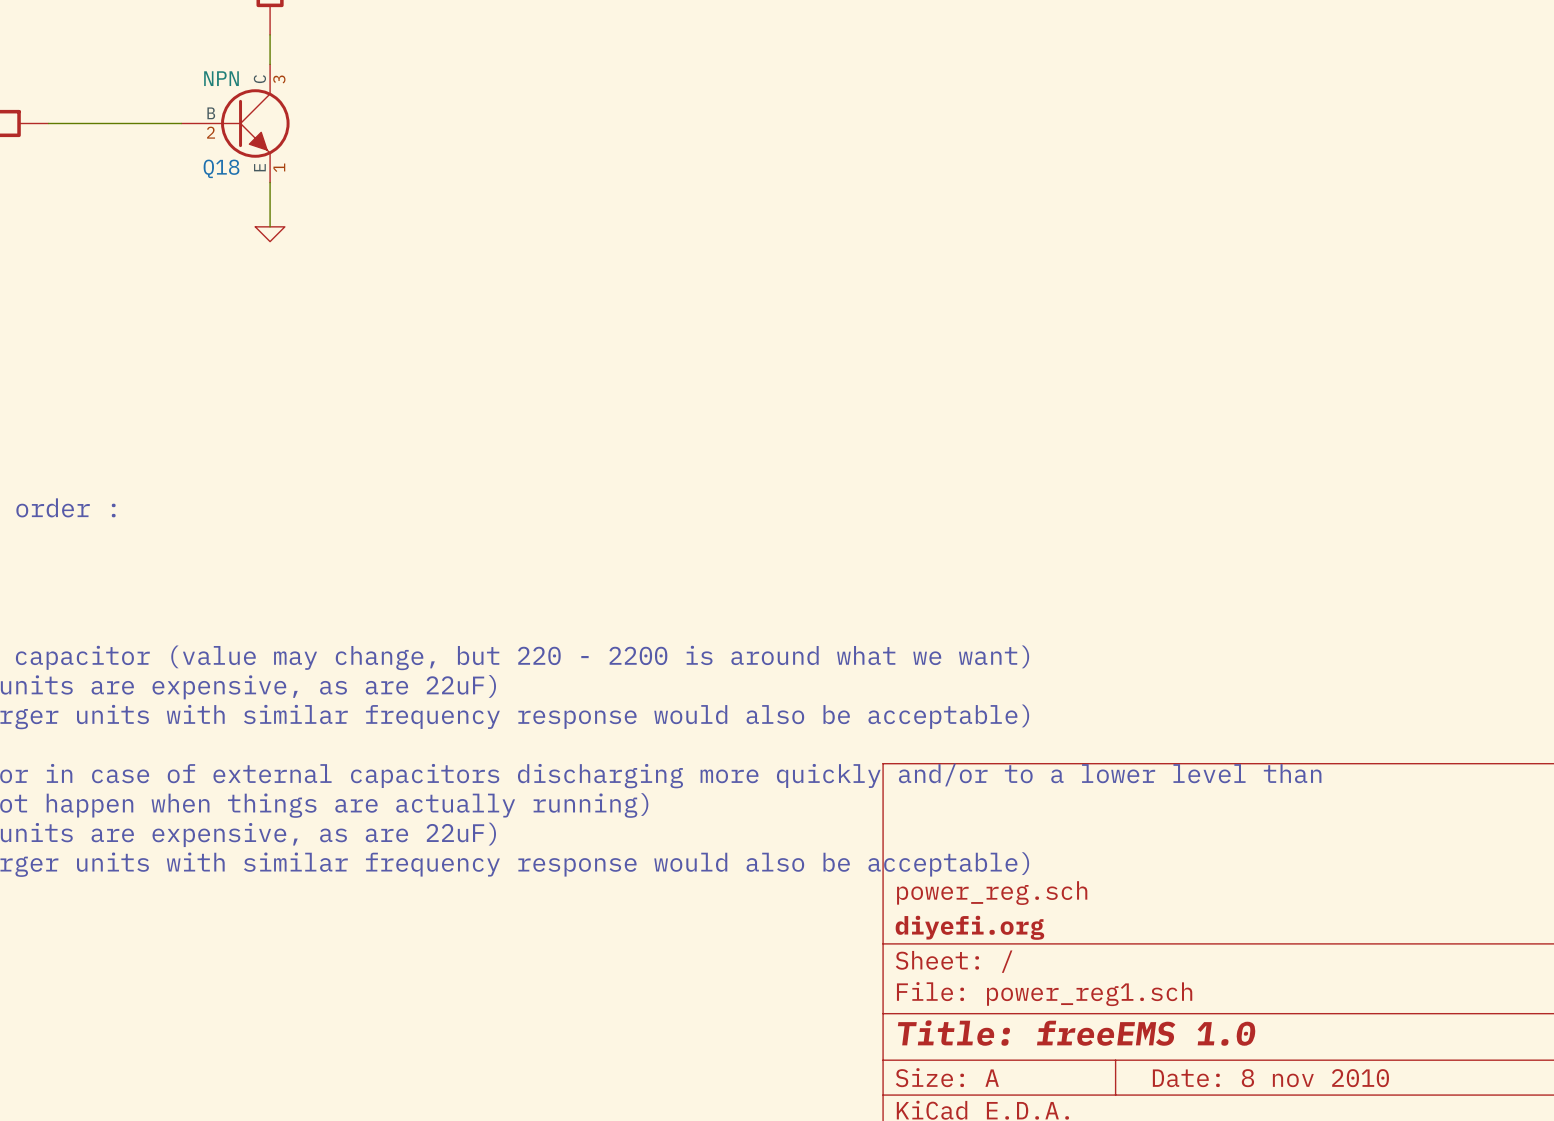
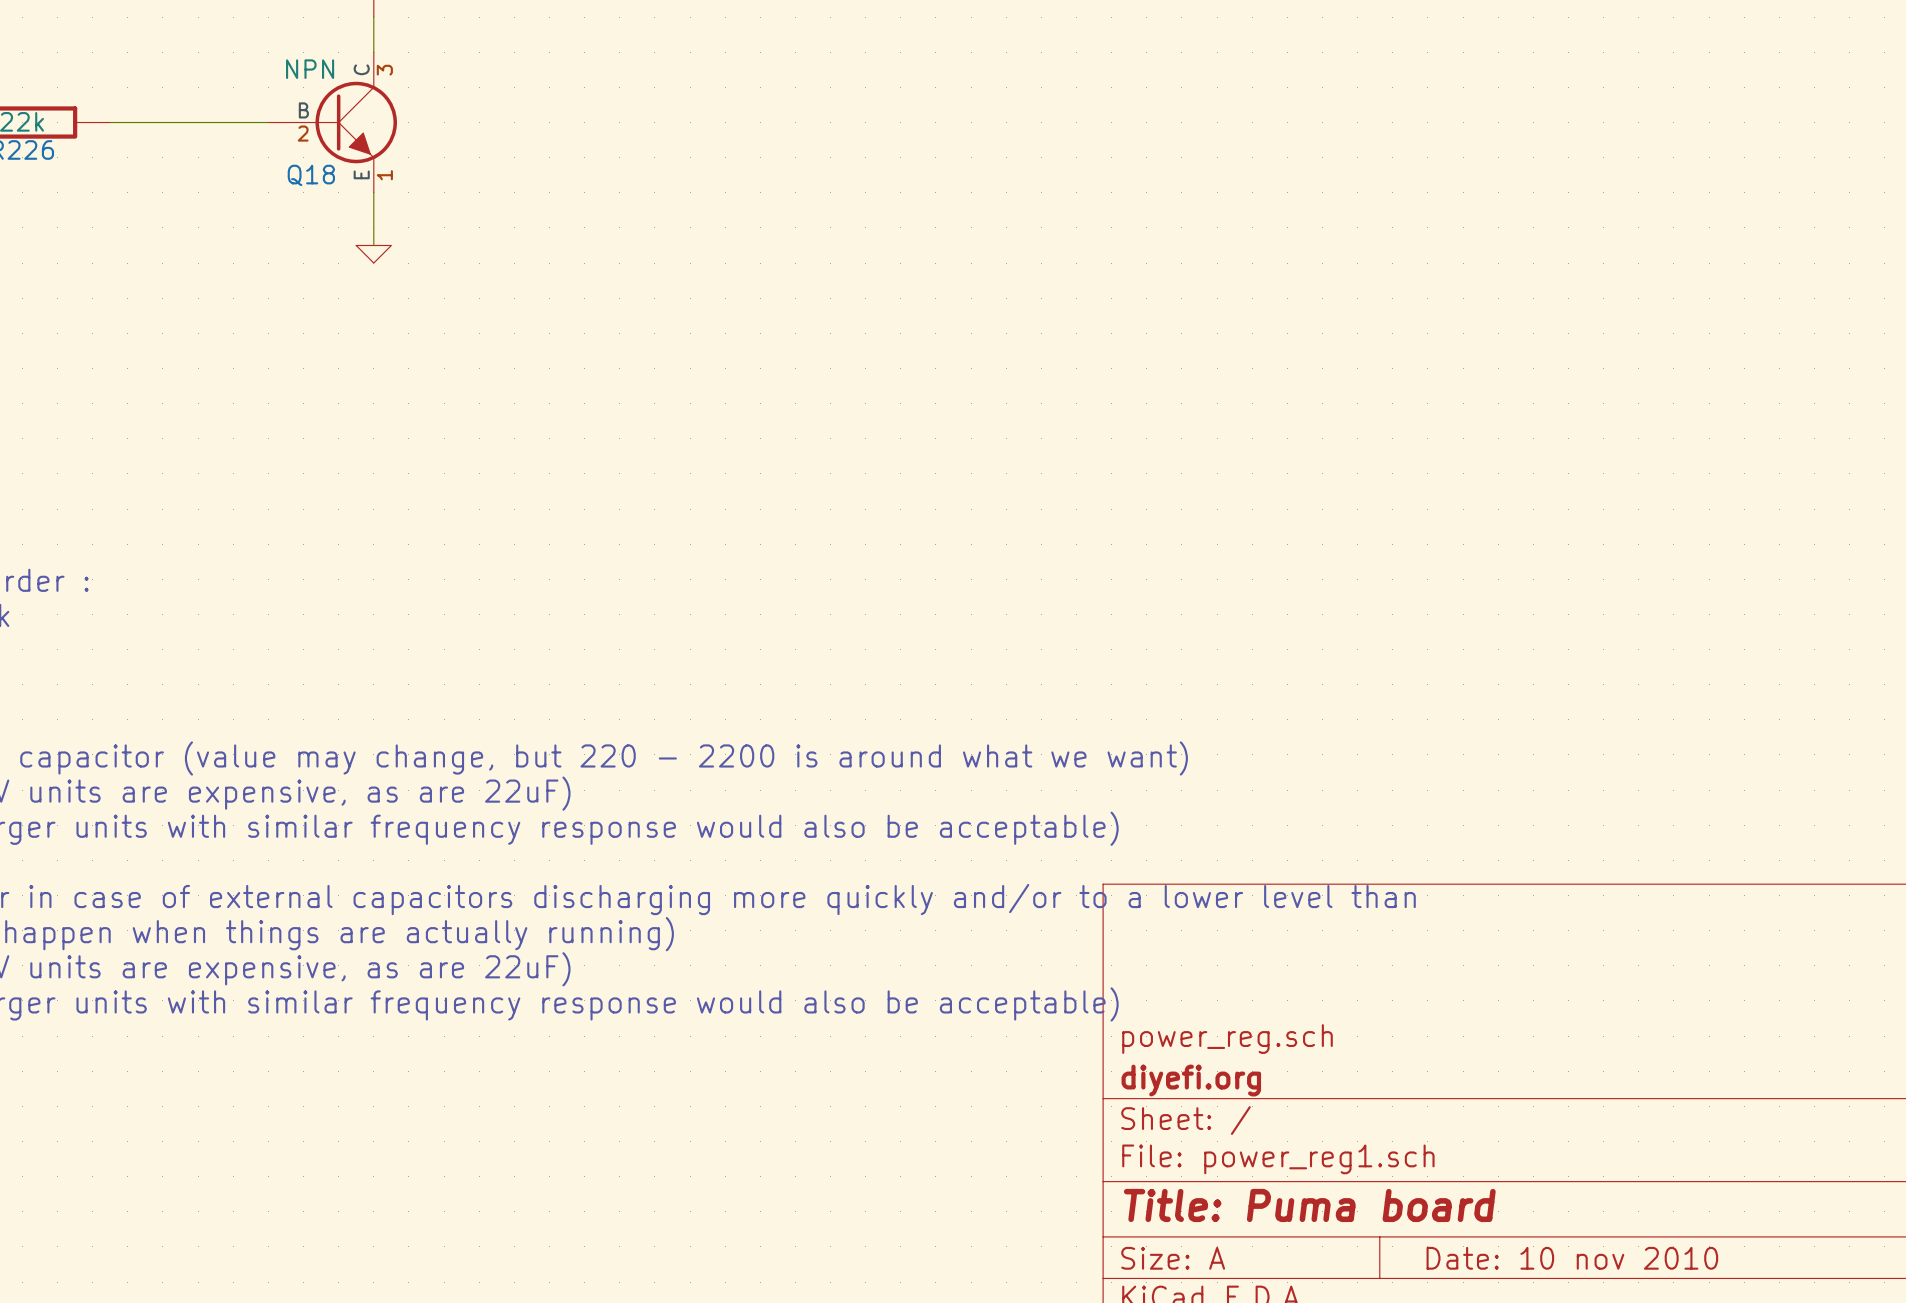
title block: Title: freeEMS 1.0 (1076, 1033) -> Title: Puma board (1309, 1205)
title block: Date: 8 nov 2010 (1270, 1078) -> Date: 10 nov 2010 (1572, 1258)

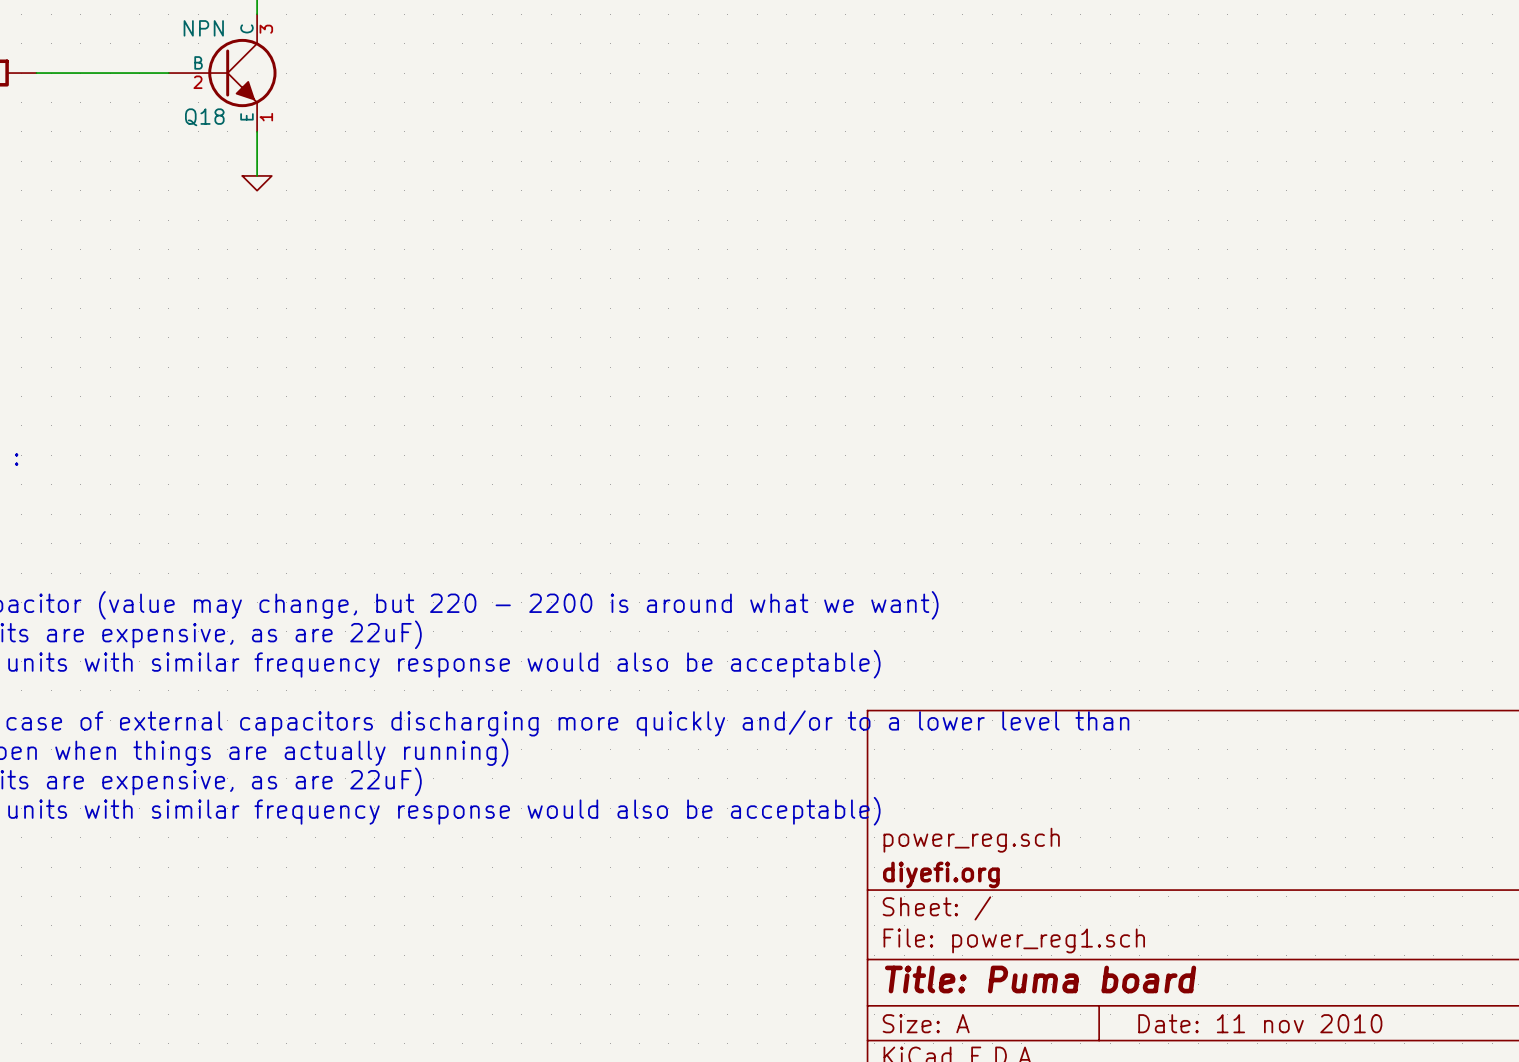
title block: Date: 10 nov 2010 (1572, 1258) -> Date: 11 nov 2010 (1260, 1023)

